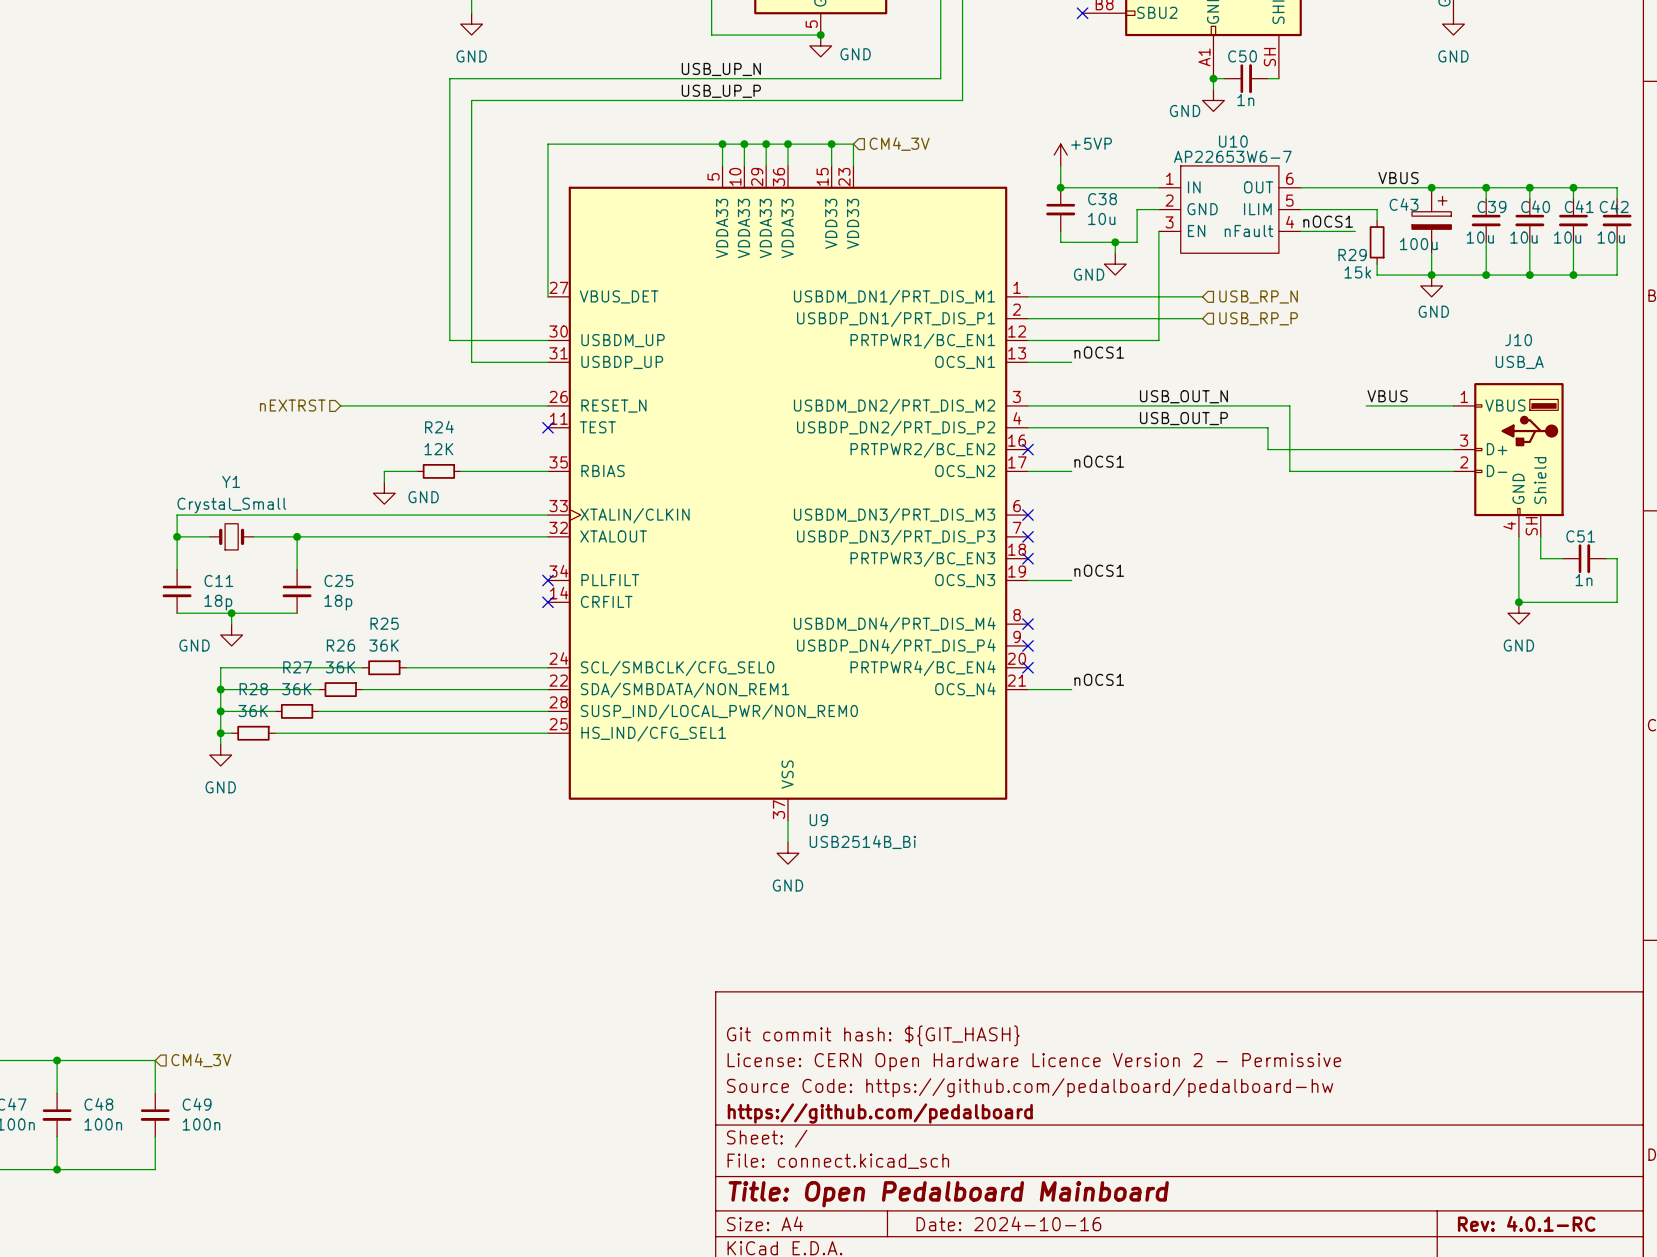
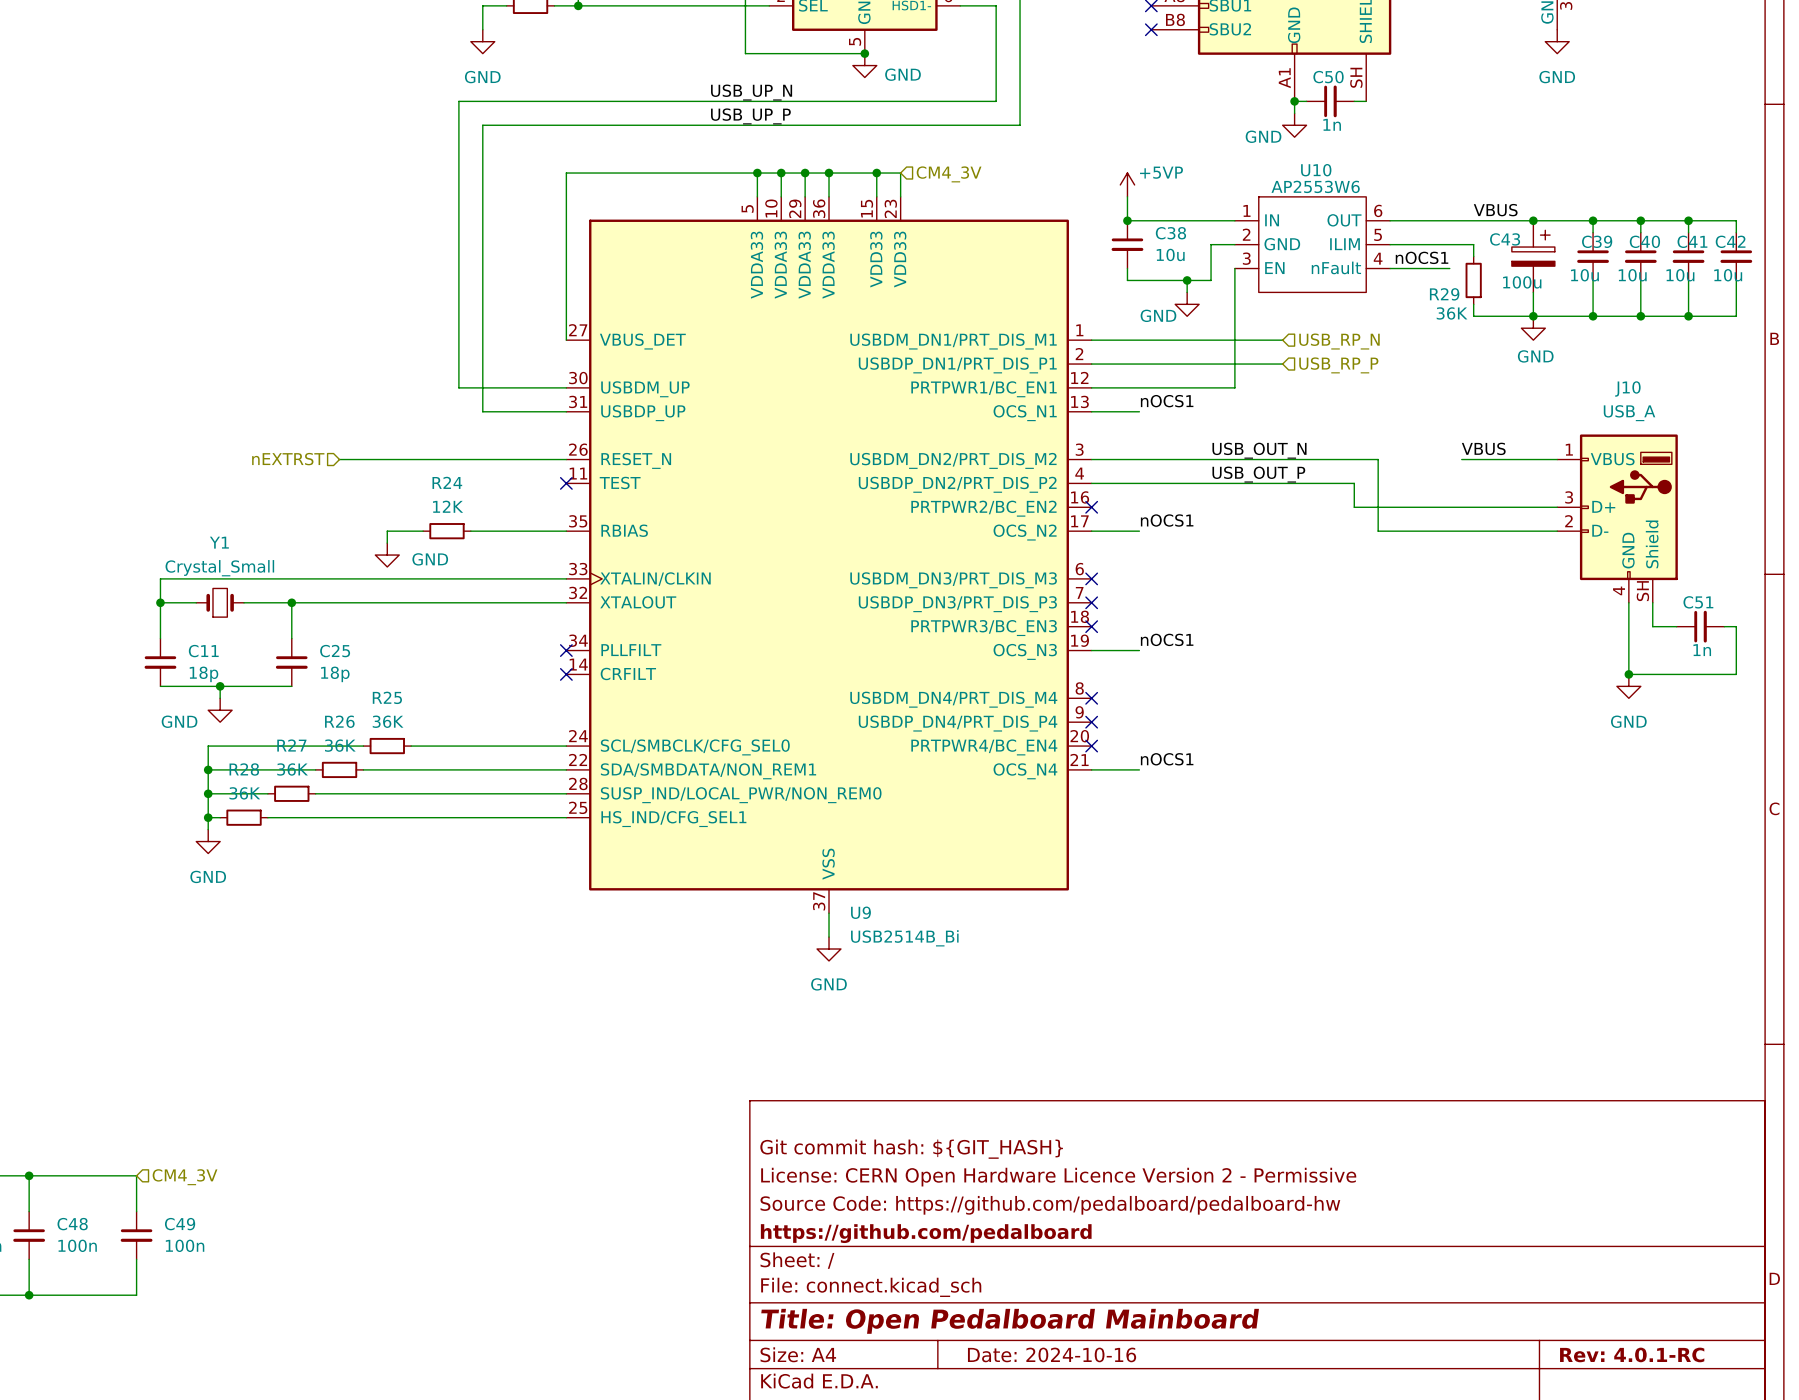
U10 value: AP22653W6-7 (1232, 156) -> AP2553W6 (1315, 186)
R29 value: 15k (1357, 272) -> 36K (1452, 313)

